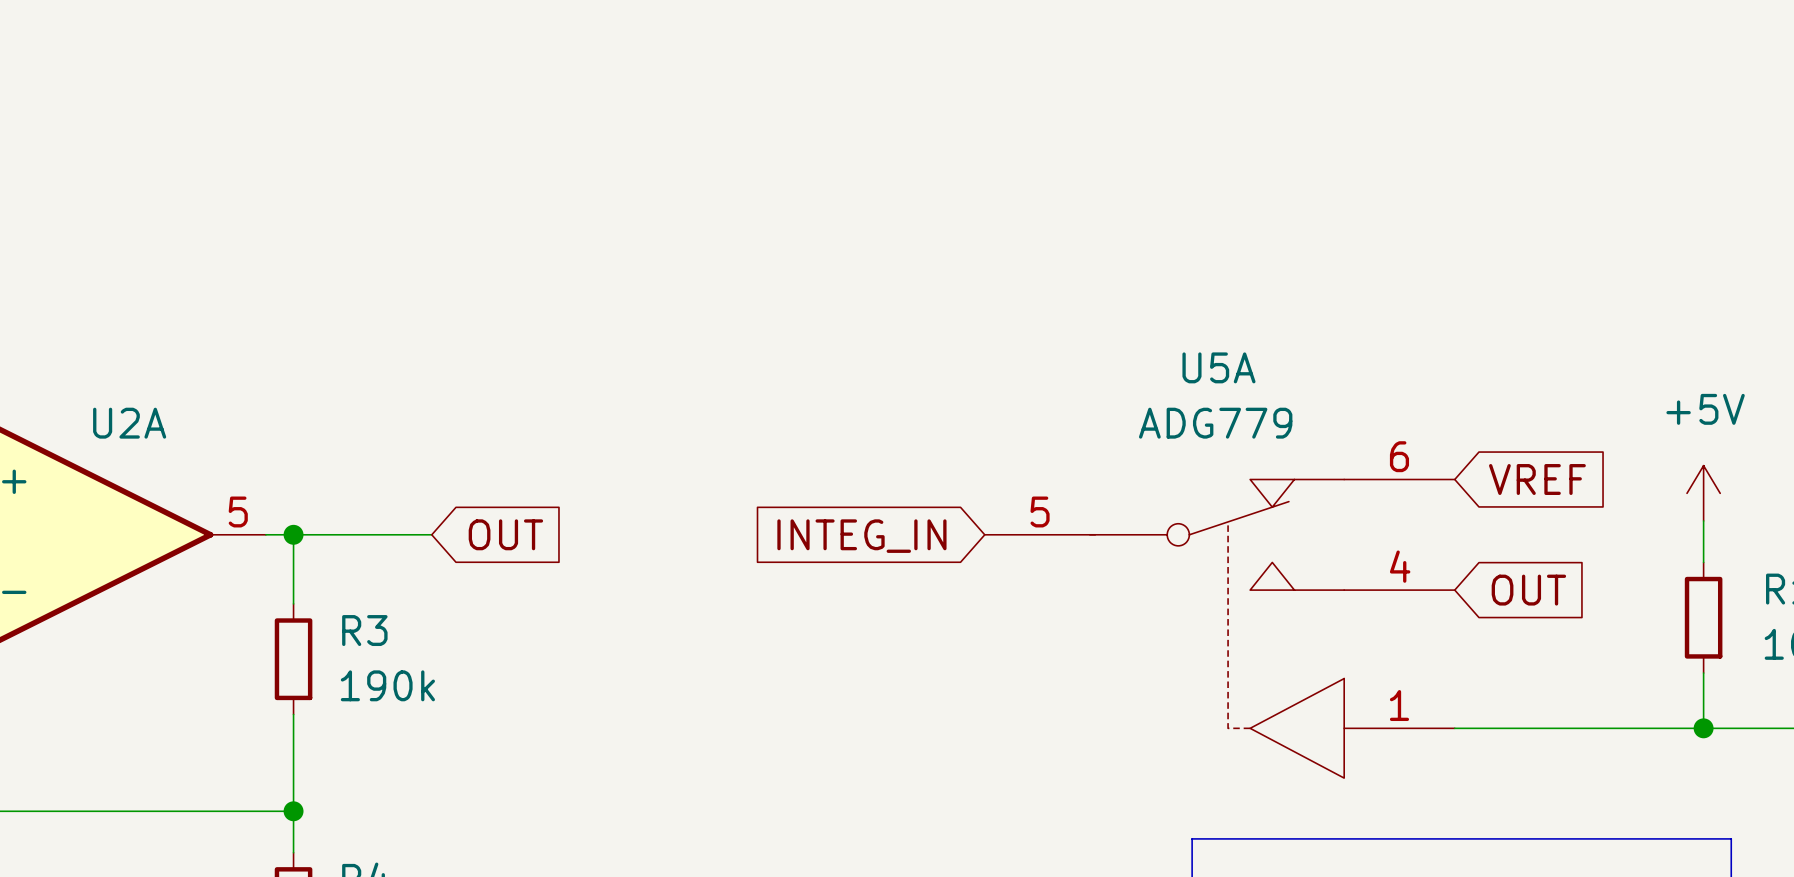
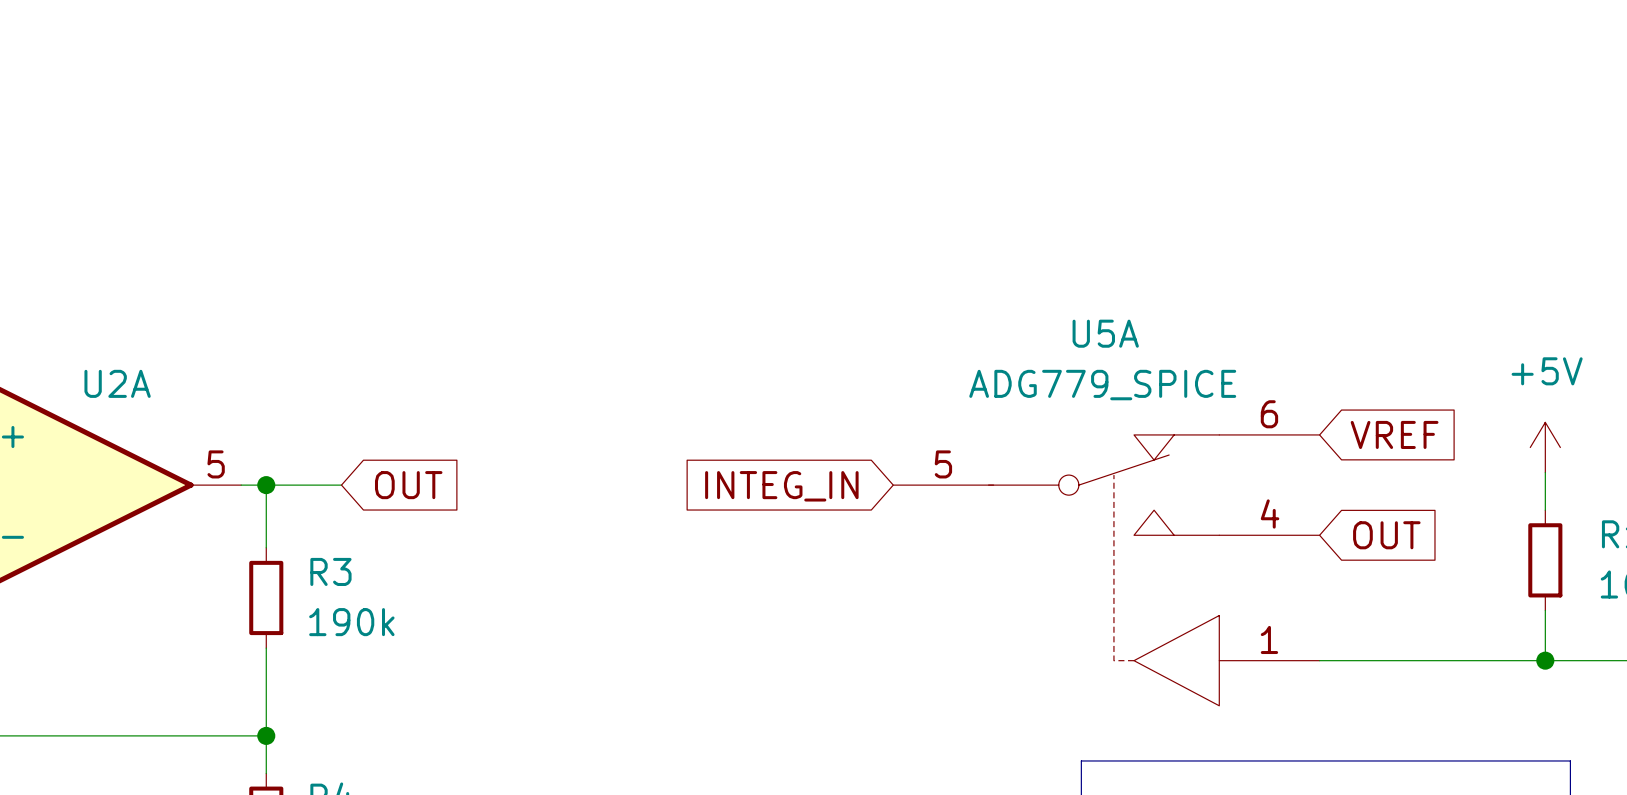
U5A value: ADG779 (1215, 423) -> ADG779_SPICE (1102, 385)
wire: (376, 534) (431, 534) -> none
global label position: OUT (505, 534) -> OUT (408, 485)

